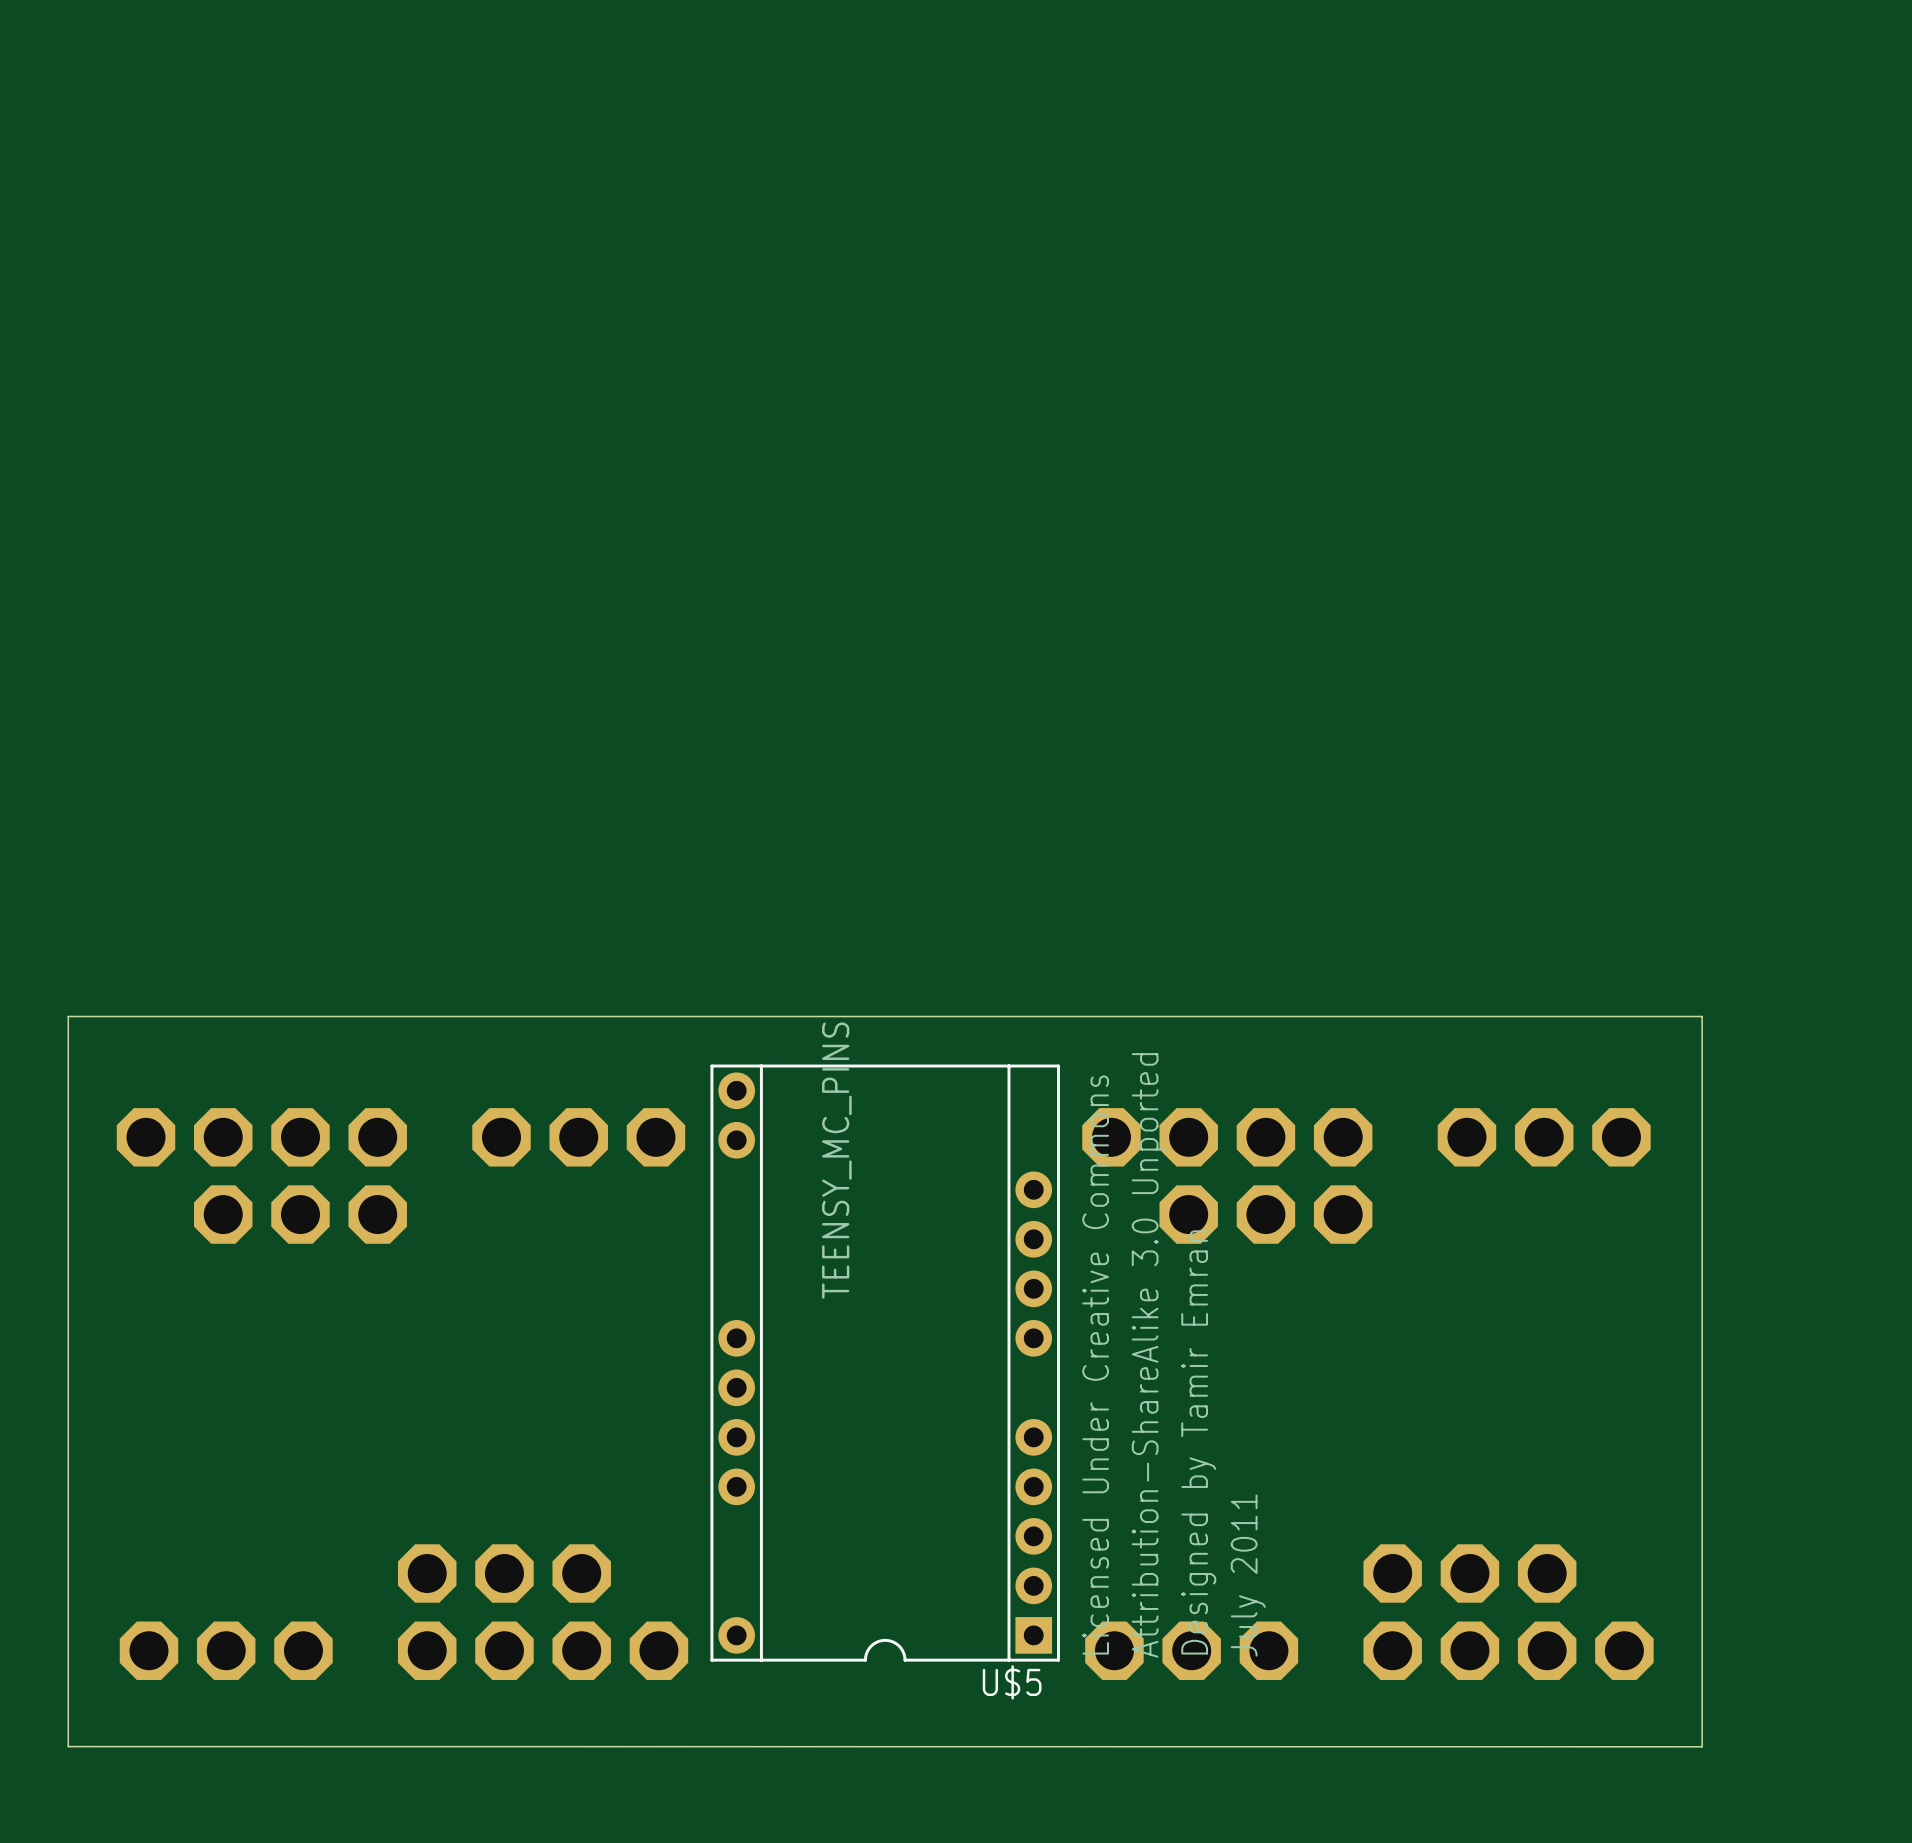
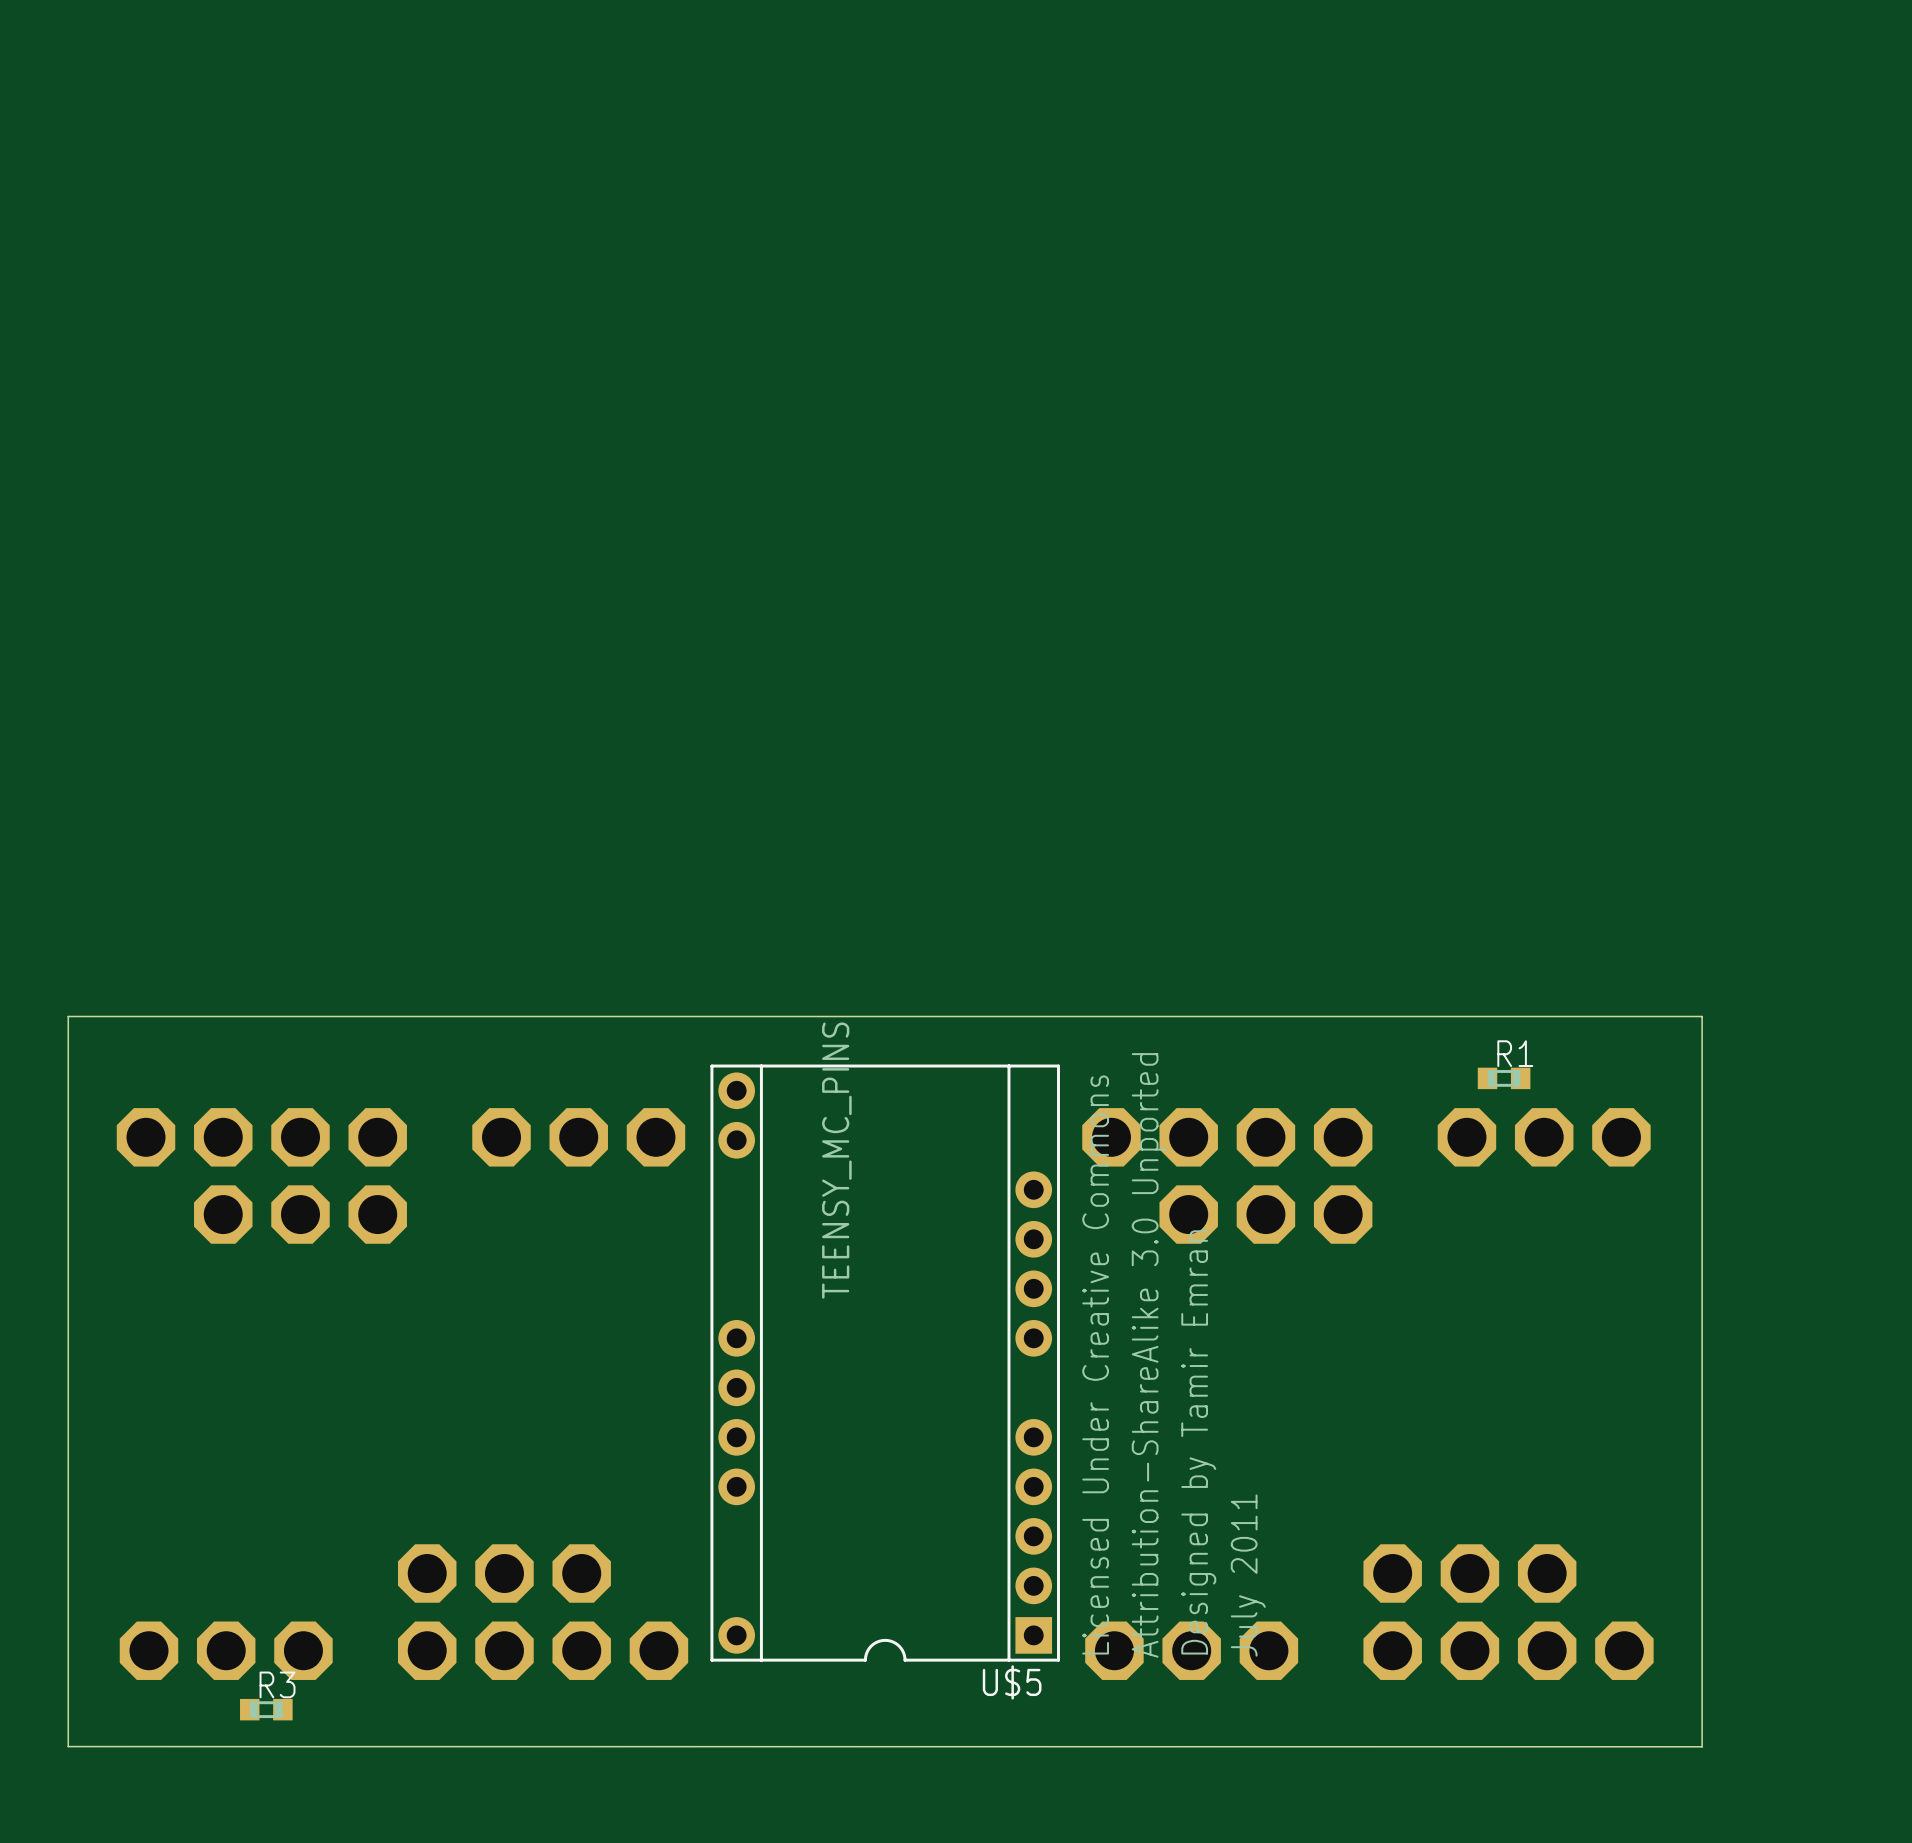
R1: none -> (1504, 1078)
R3: none -> (266, 1709)

